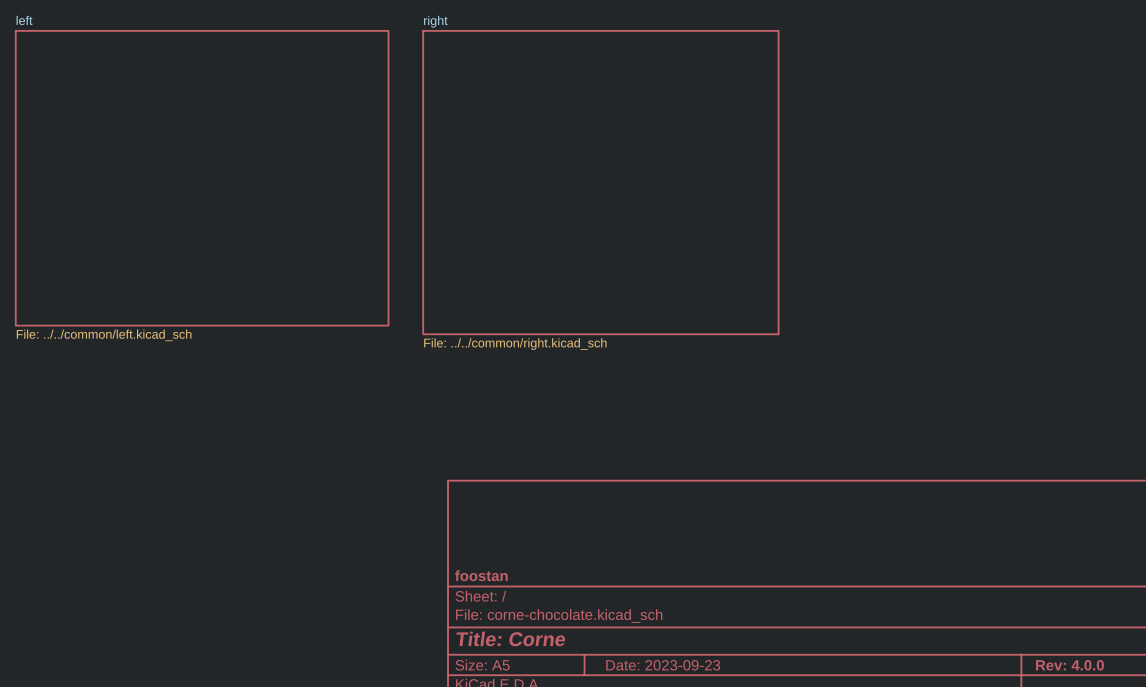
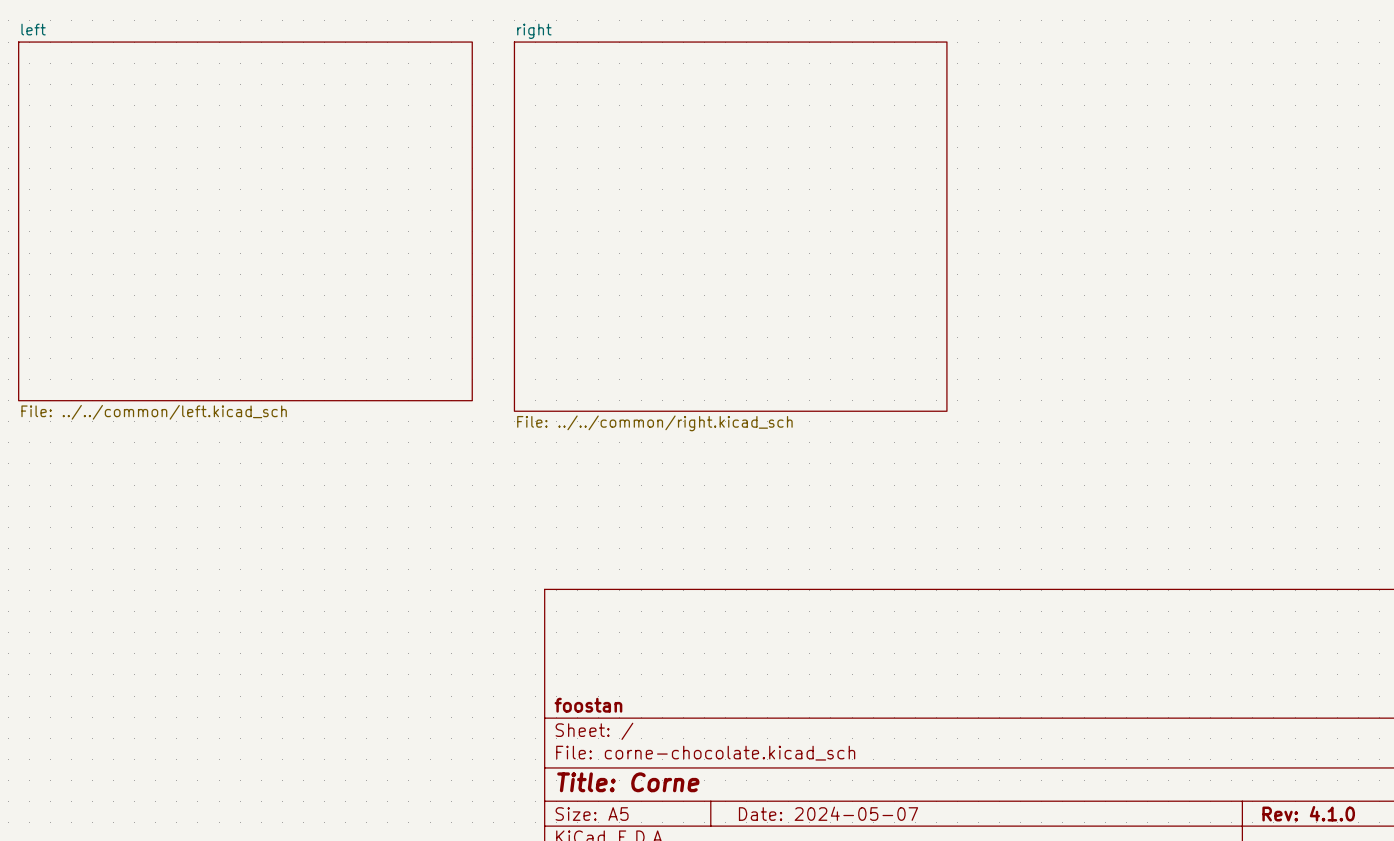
title block: Date: 2023-09-23 (663, 665) -> Date: 2024-05-07 (828, 813)
title block: Rev: 4.0.0 (1069, 665) -> Rev: 4.1.0 (1308, 813)

